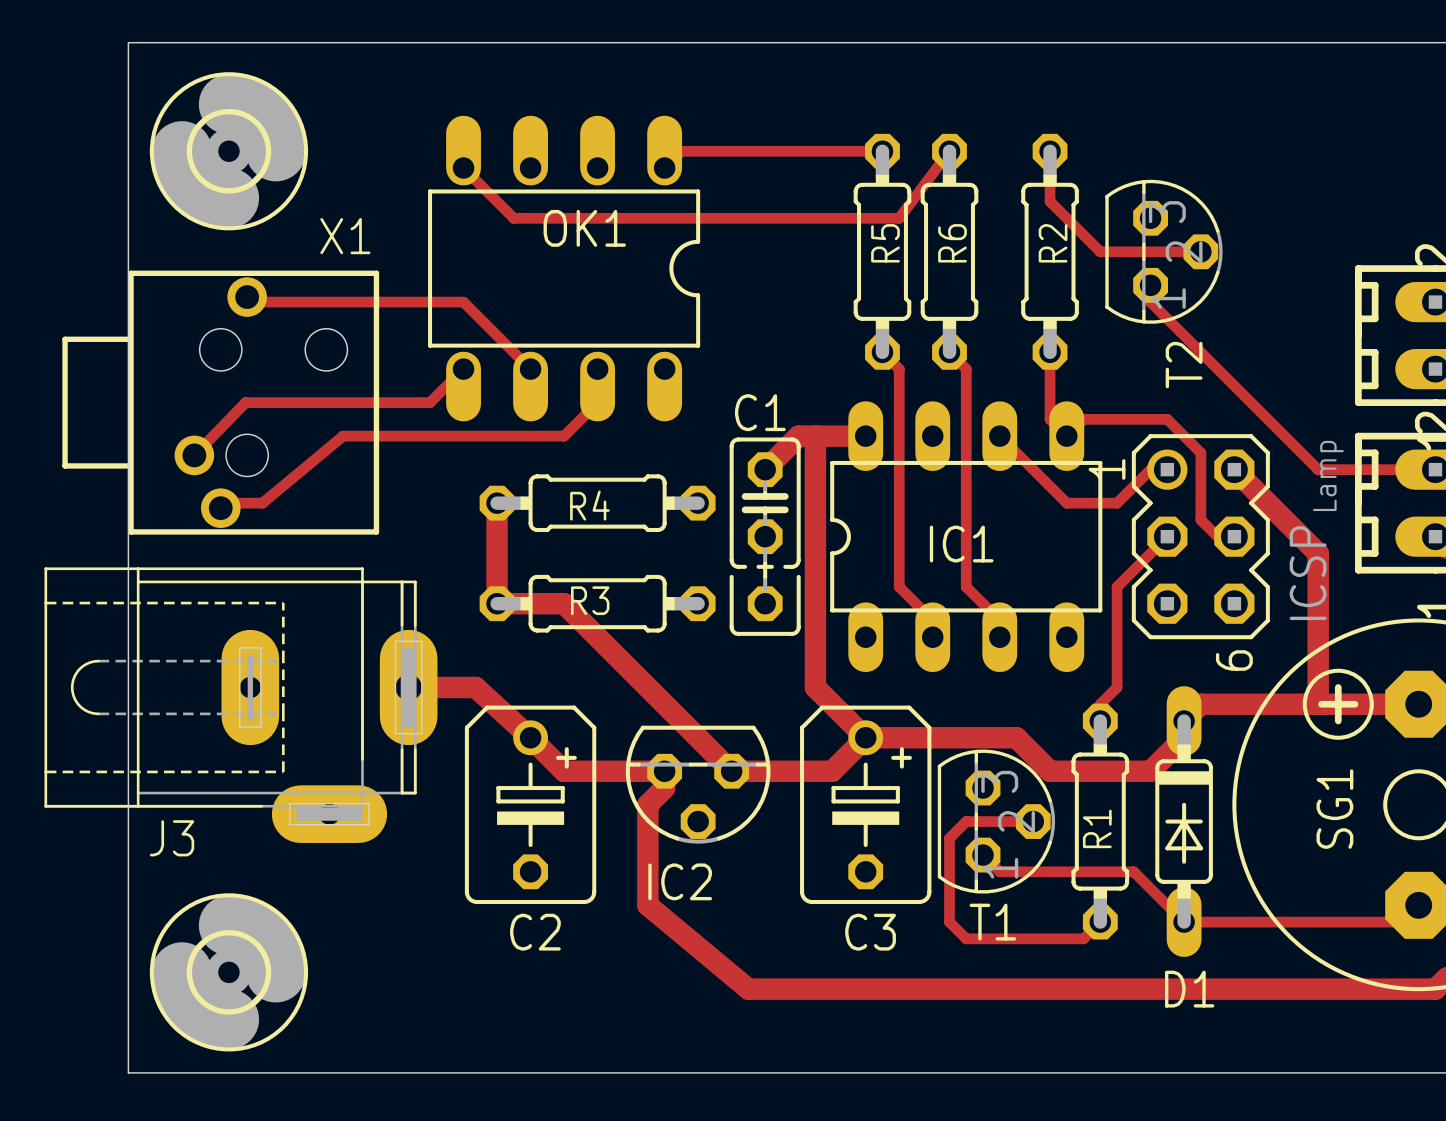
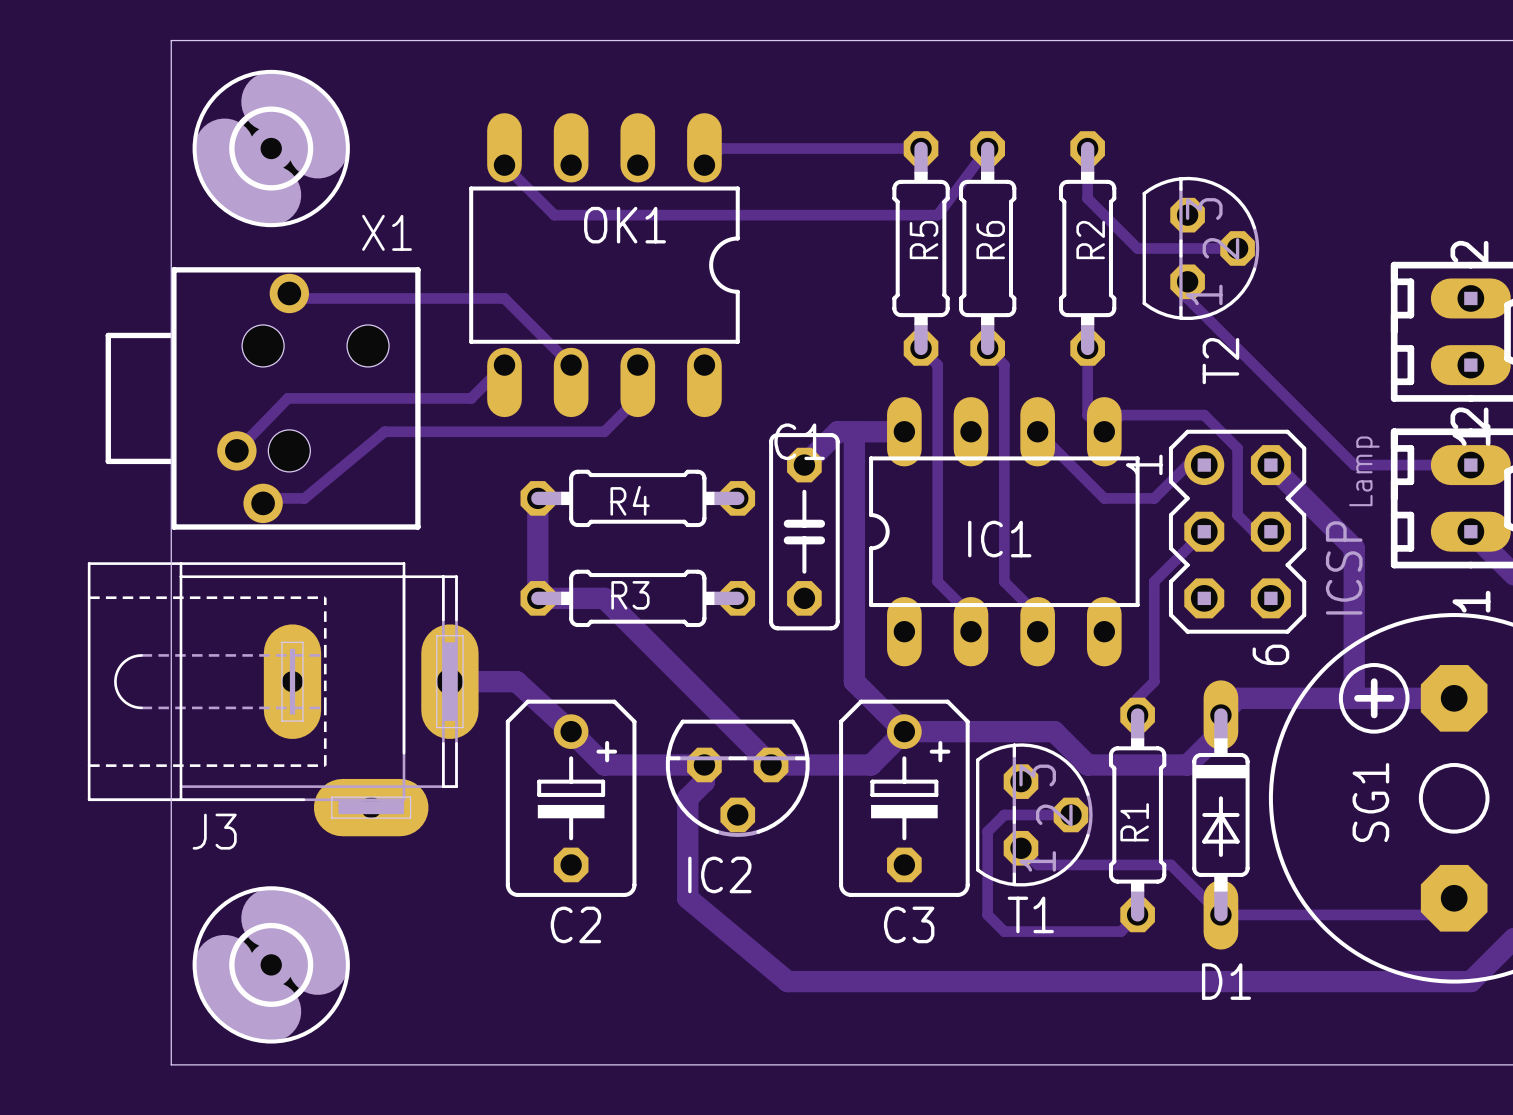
C1 footprint: [729, 437, 801, 636] -> [769, 433, 840, 631]

